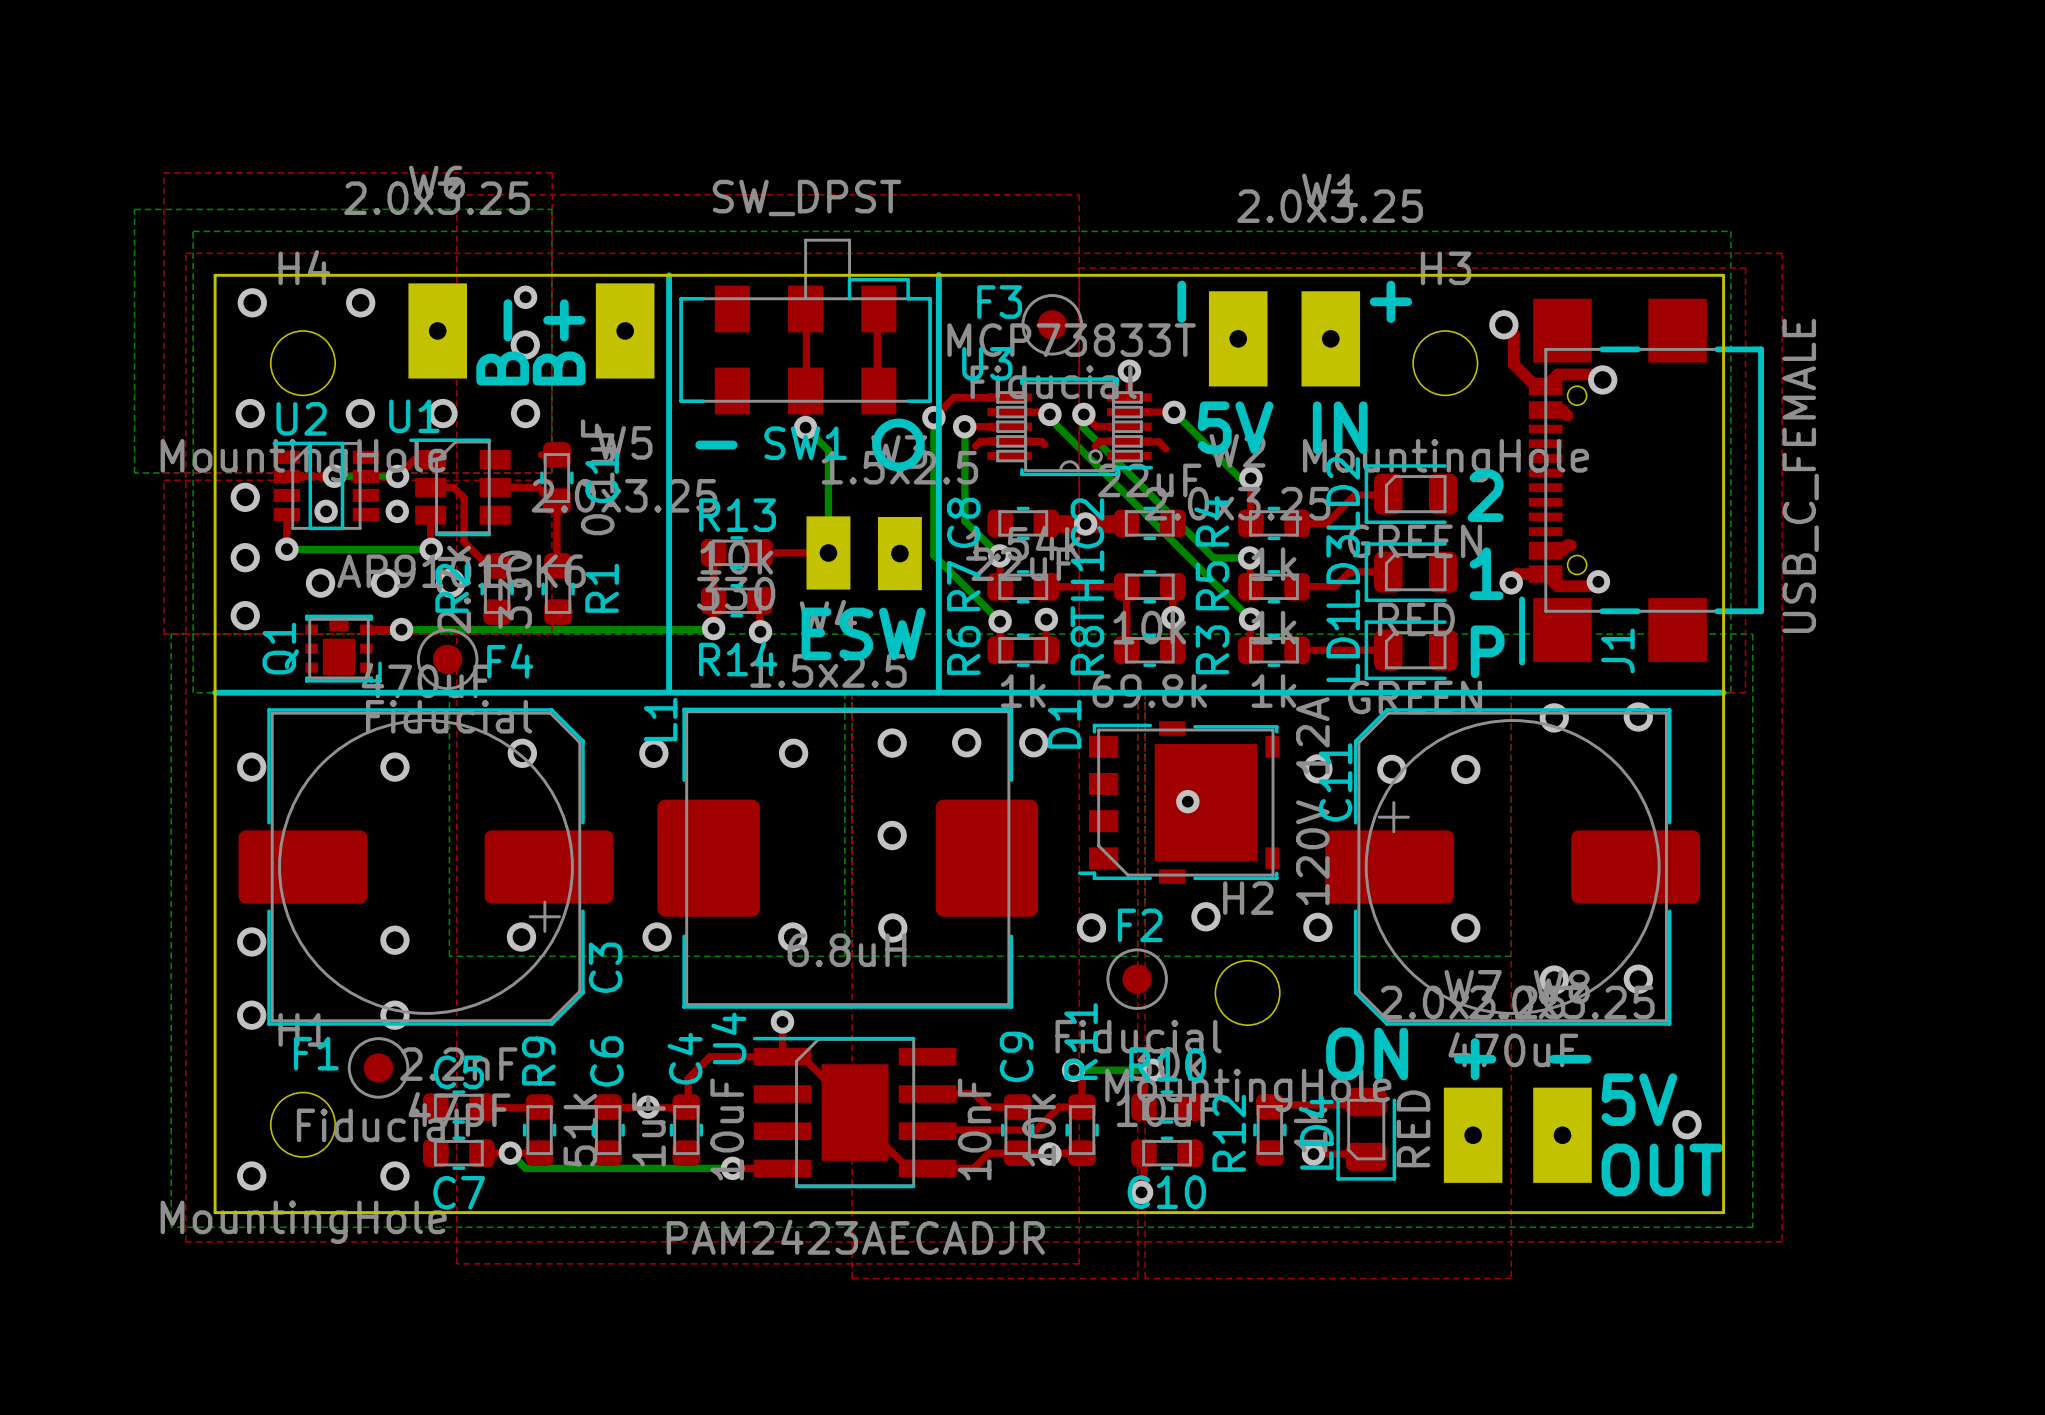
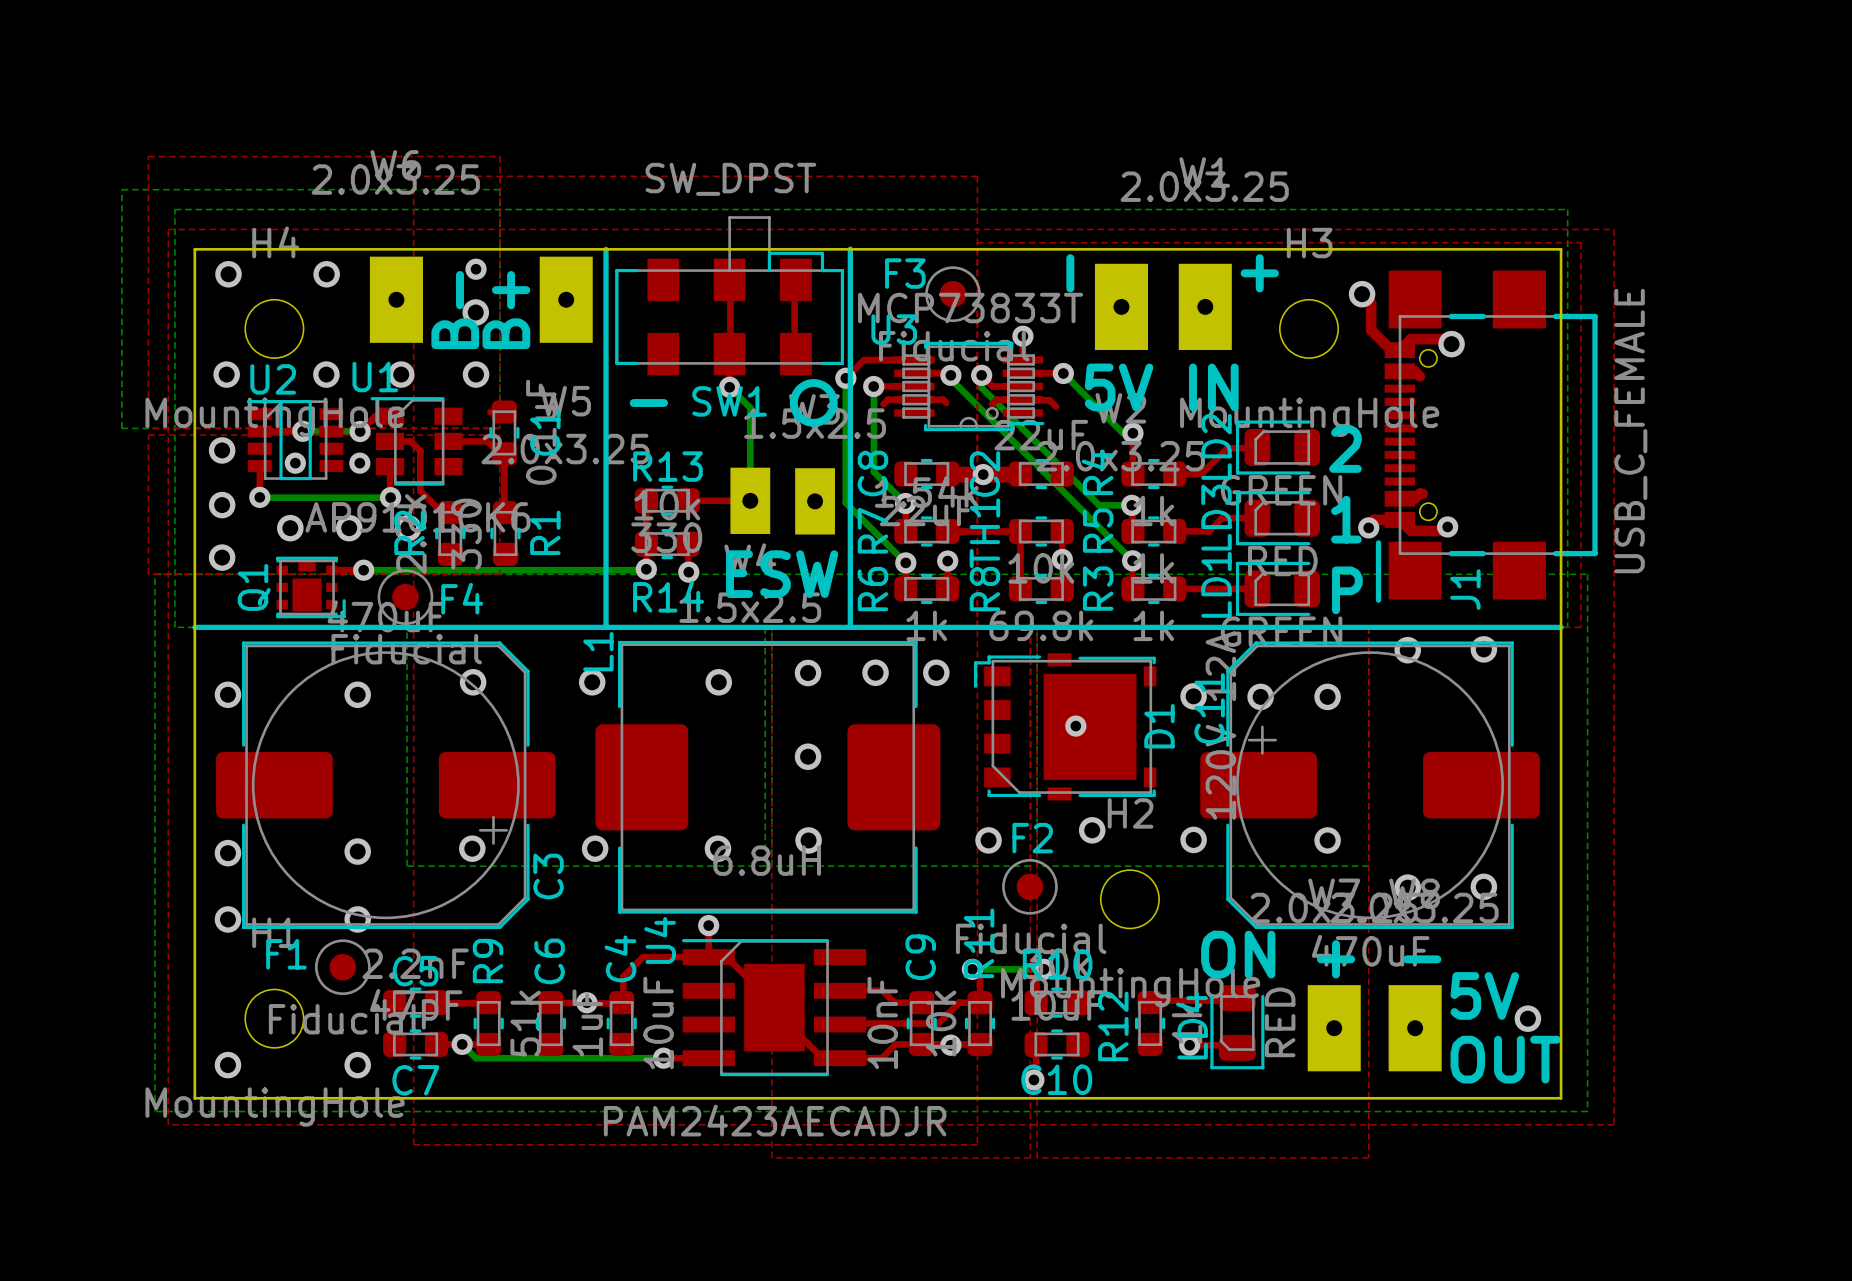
D1 footprint: [1077, 721, 1280, 884] -> [974, 653, 1157, 801]
D1 name position: D1 (1064, 724) -> D1 (1159, 726)

